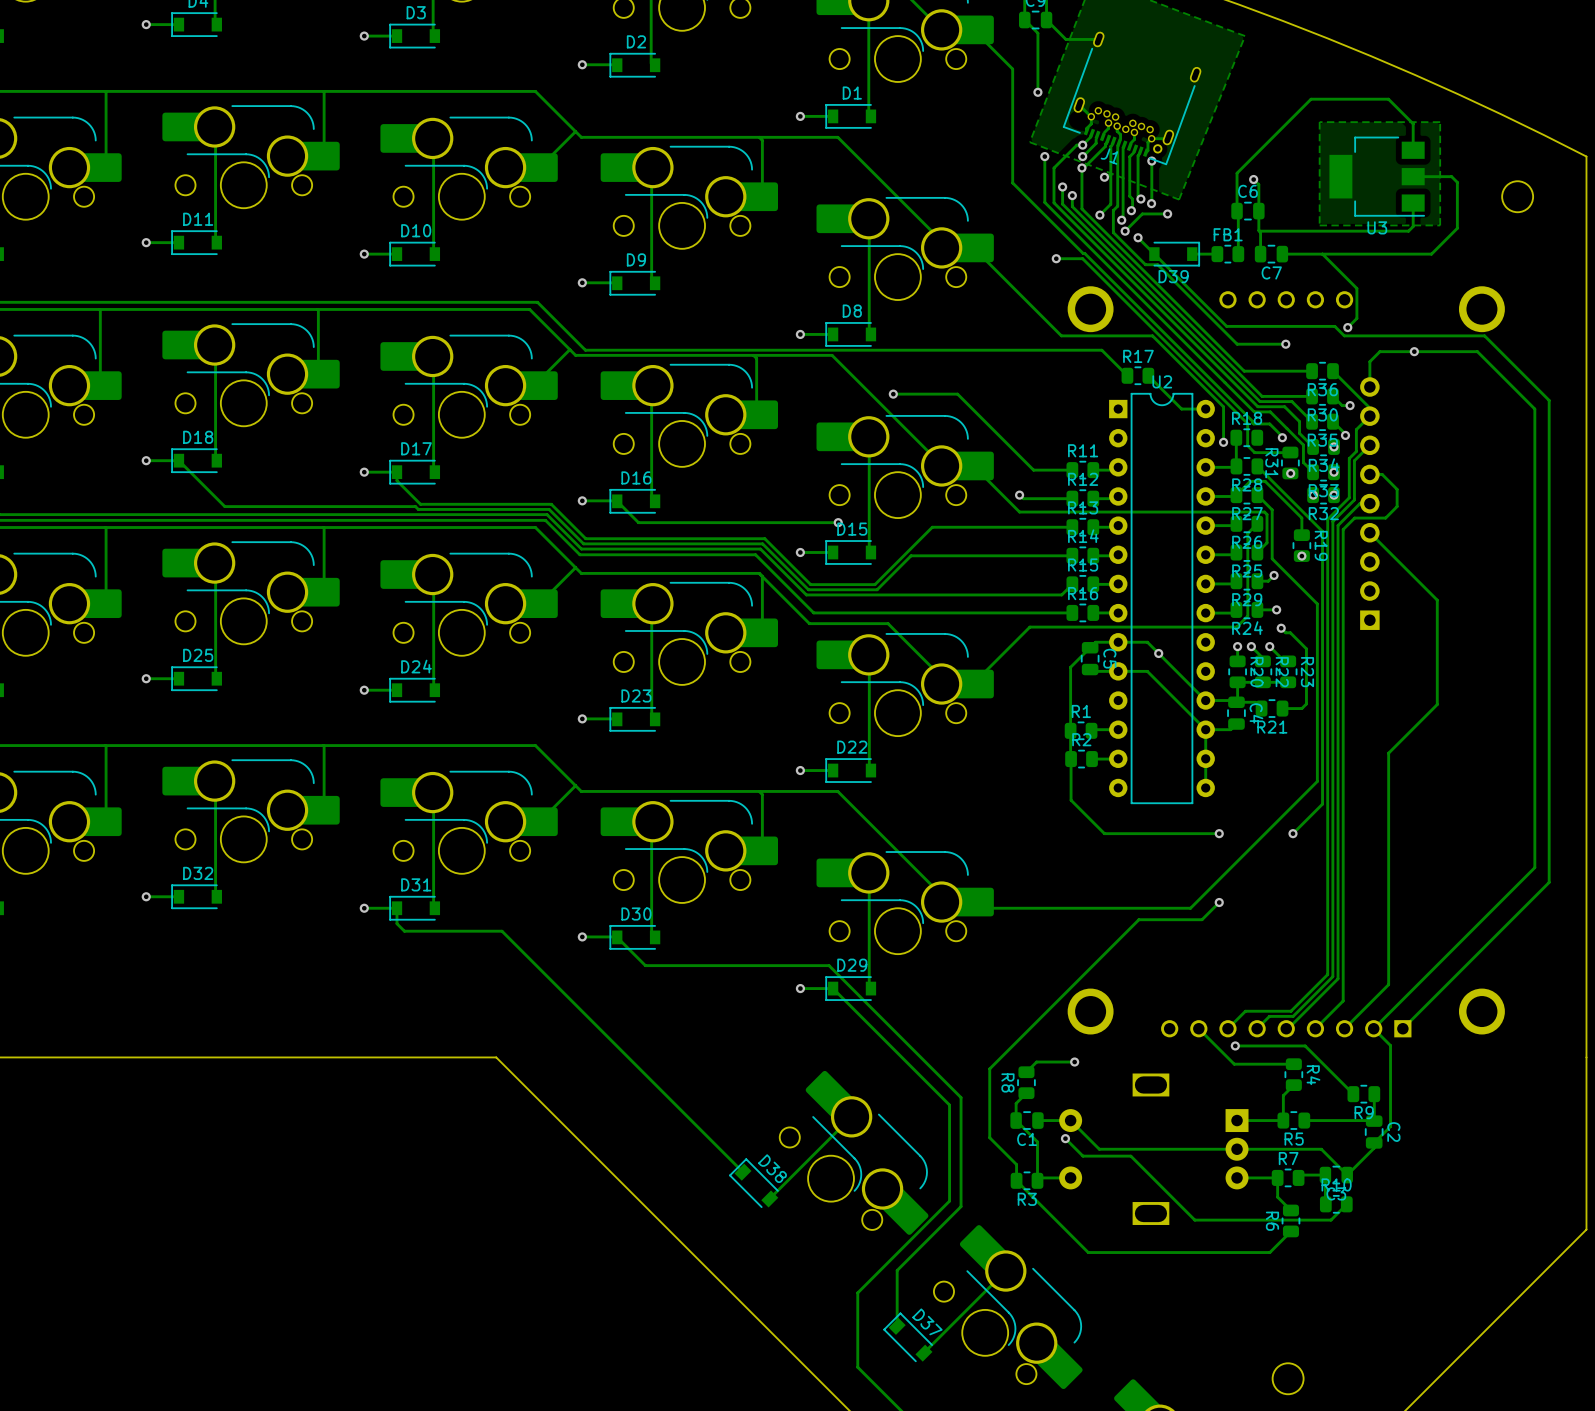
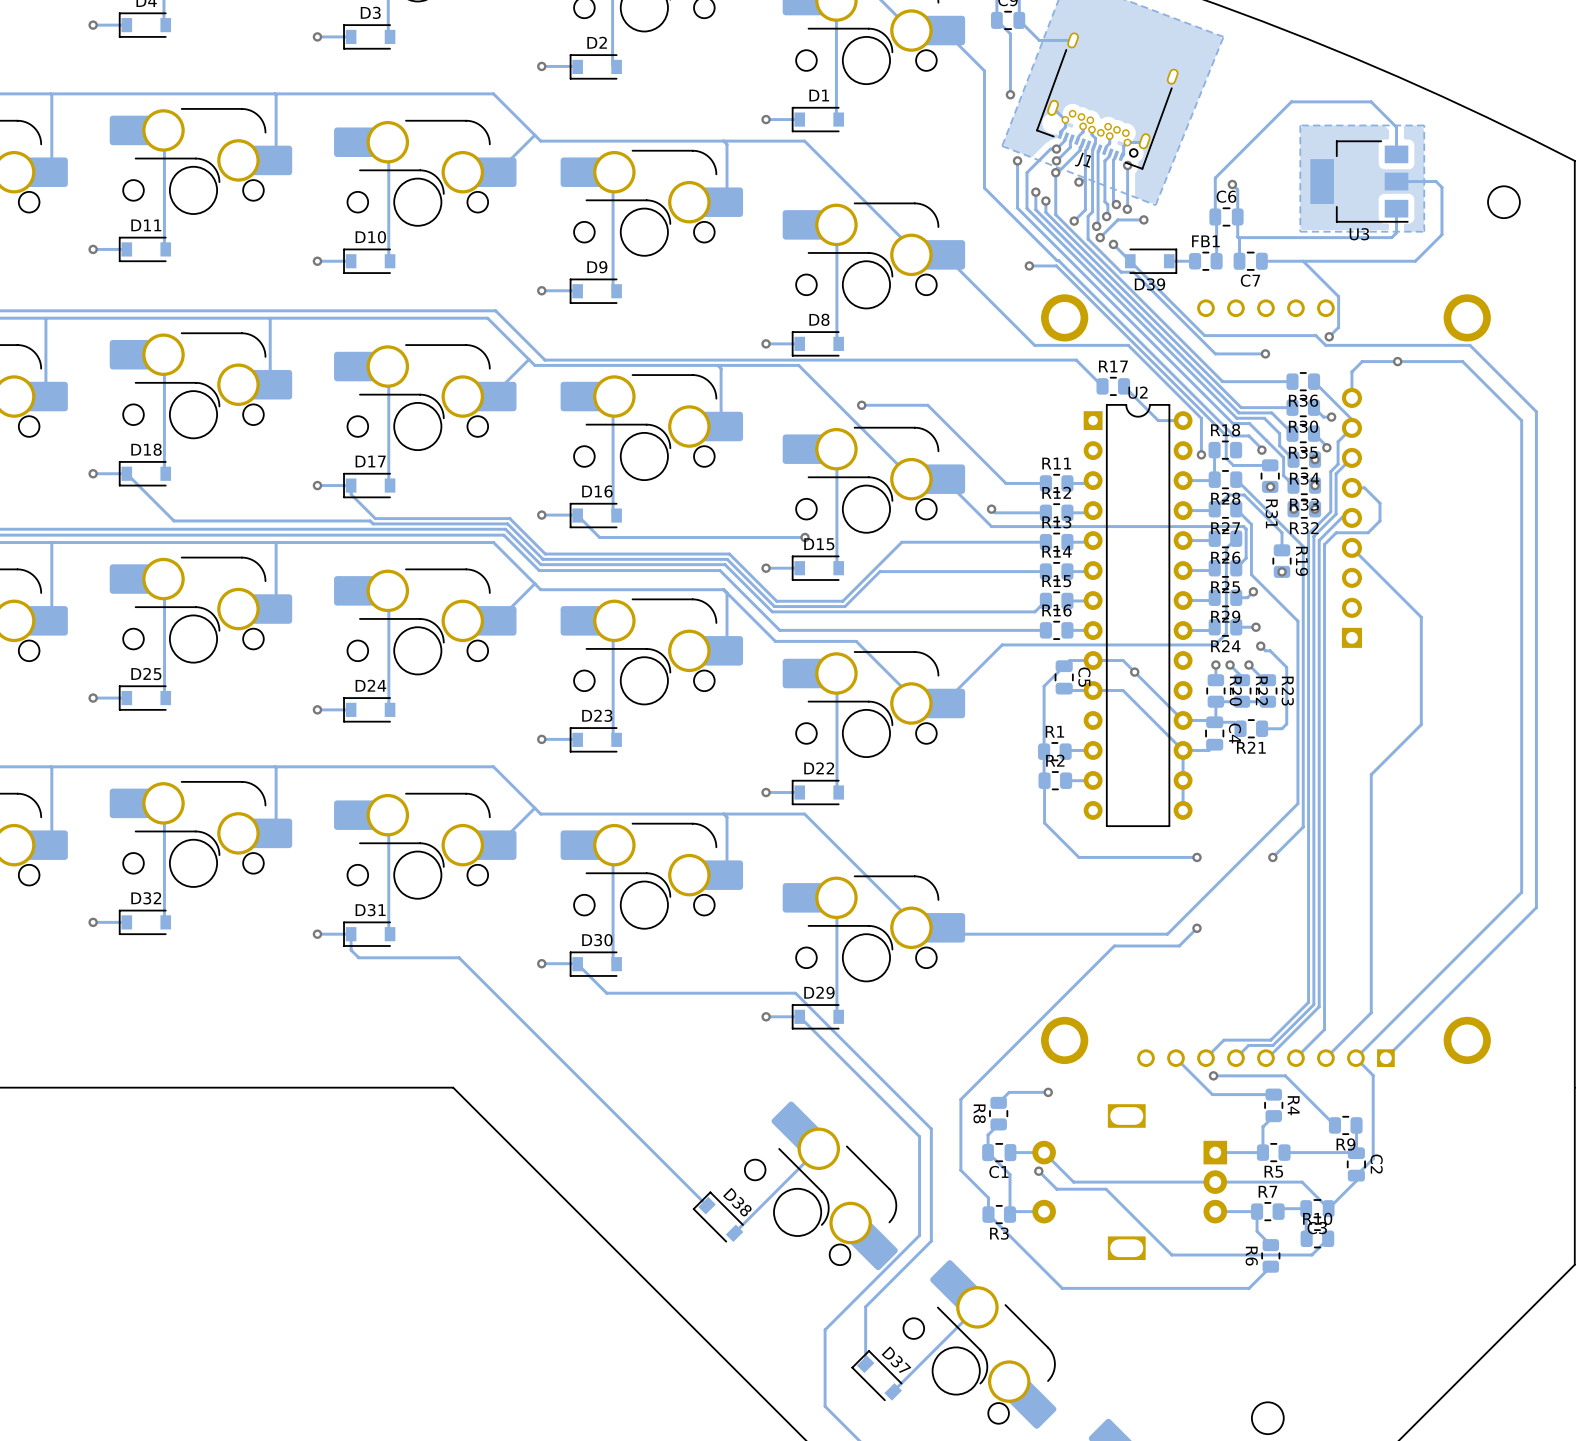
R31 name position: R31 (1271, 463) -> R31 (1271, 513)

